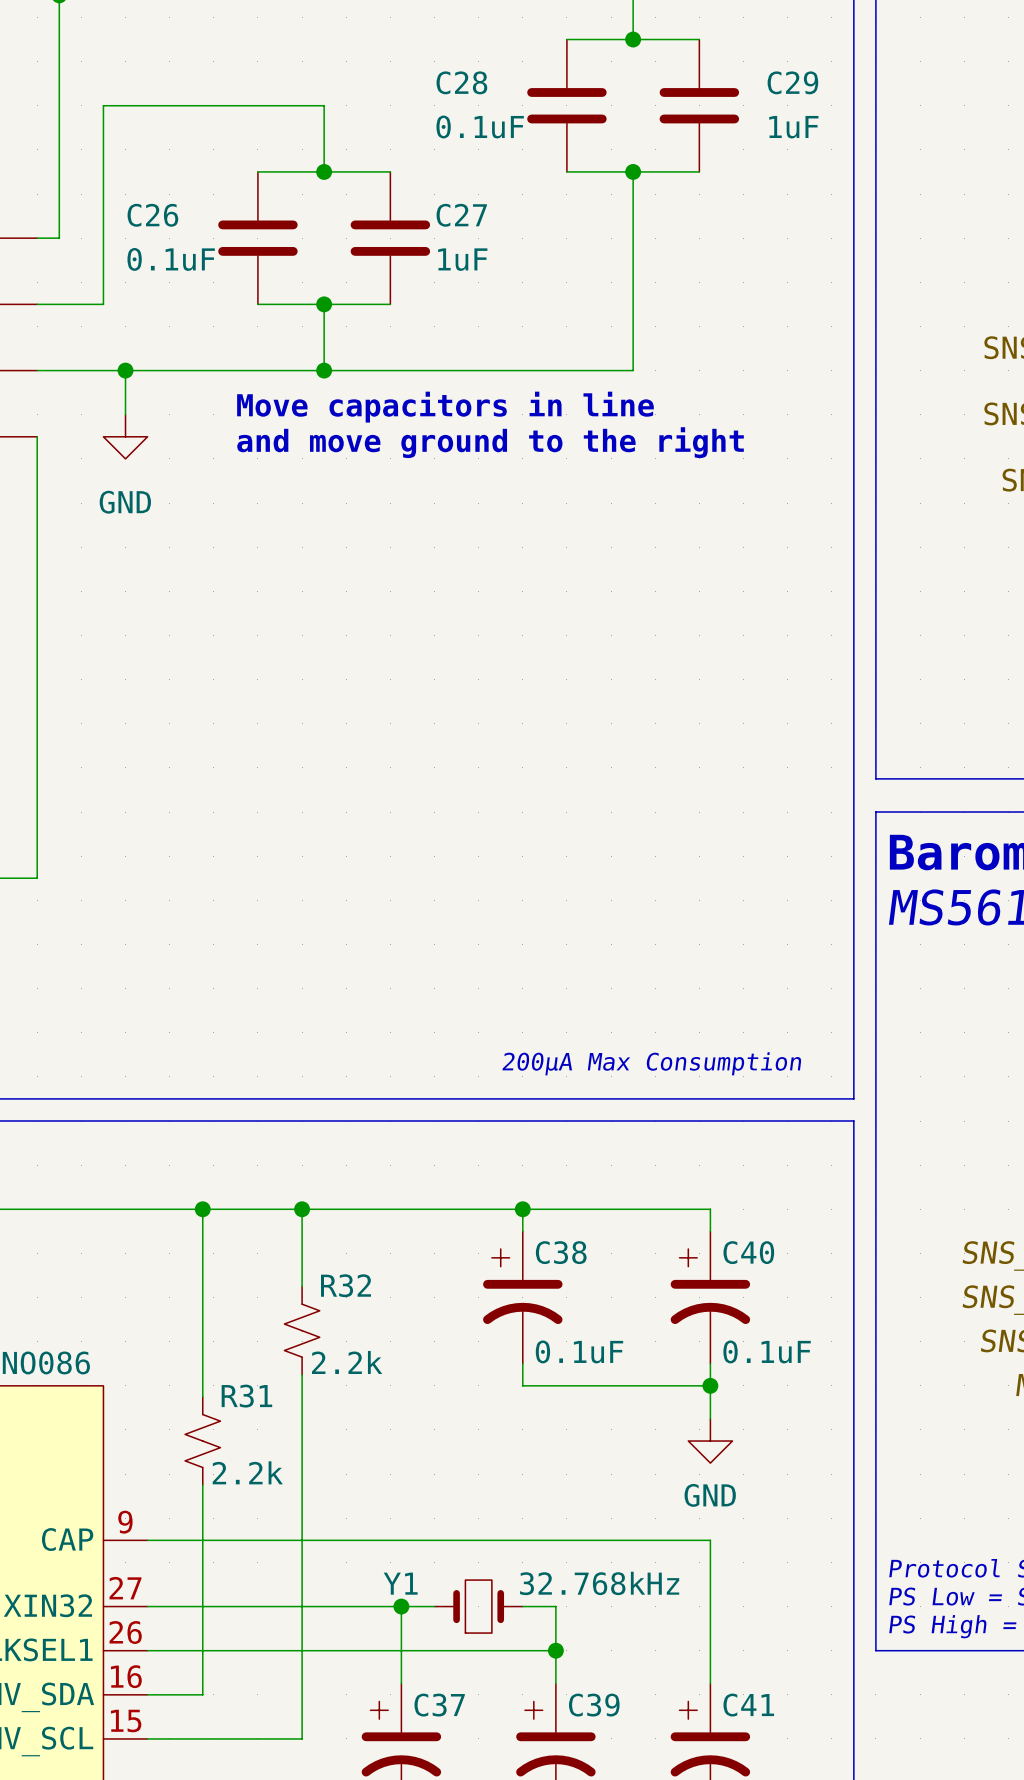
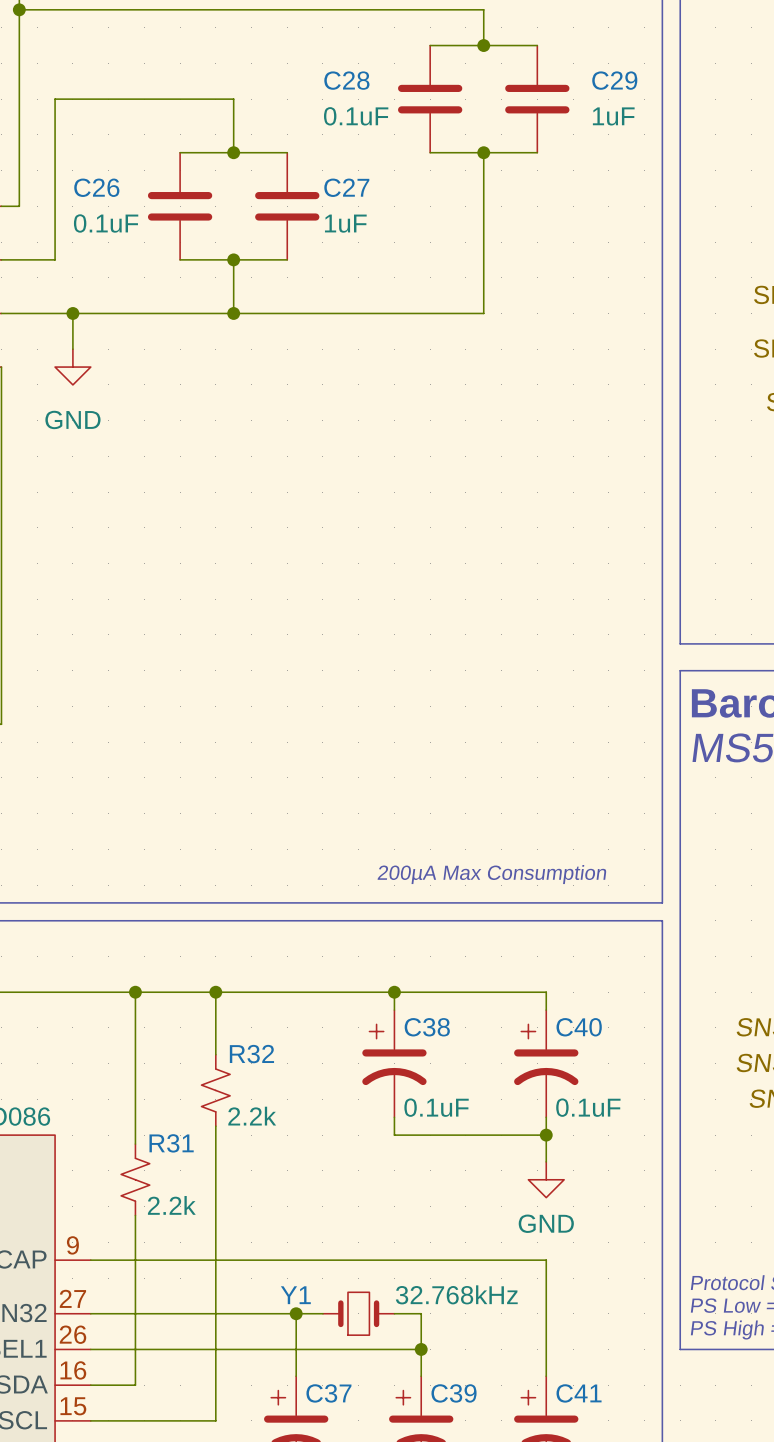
text: Move capacitors in line (445, 407) -> none
text: and move ground to the right (490, 442) -> none

